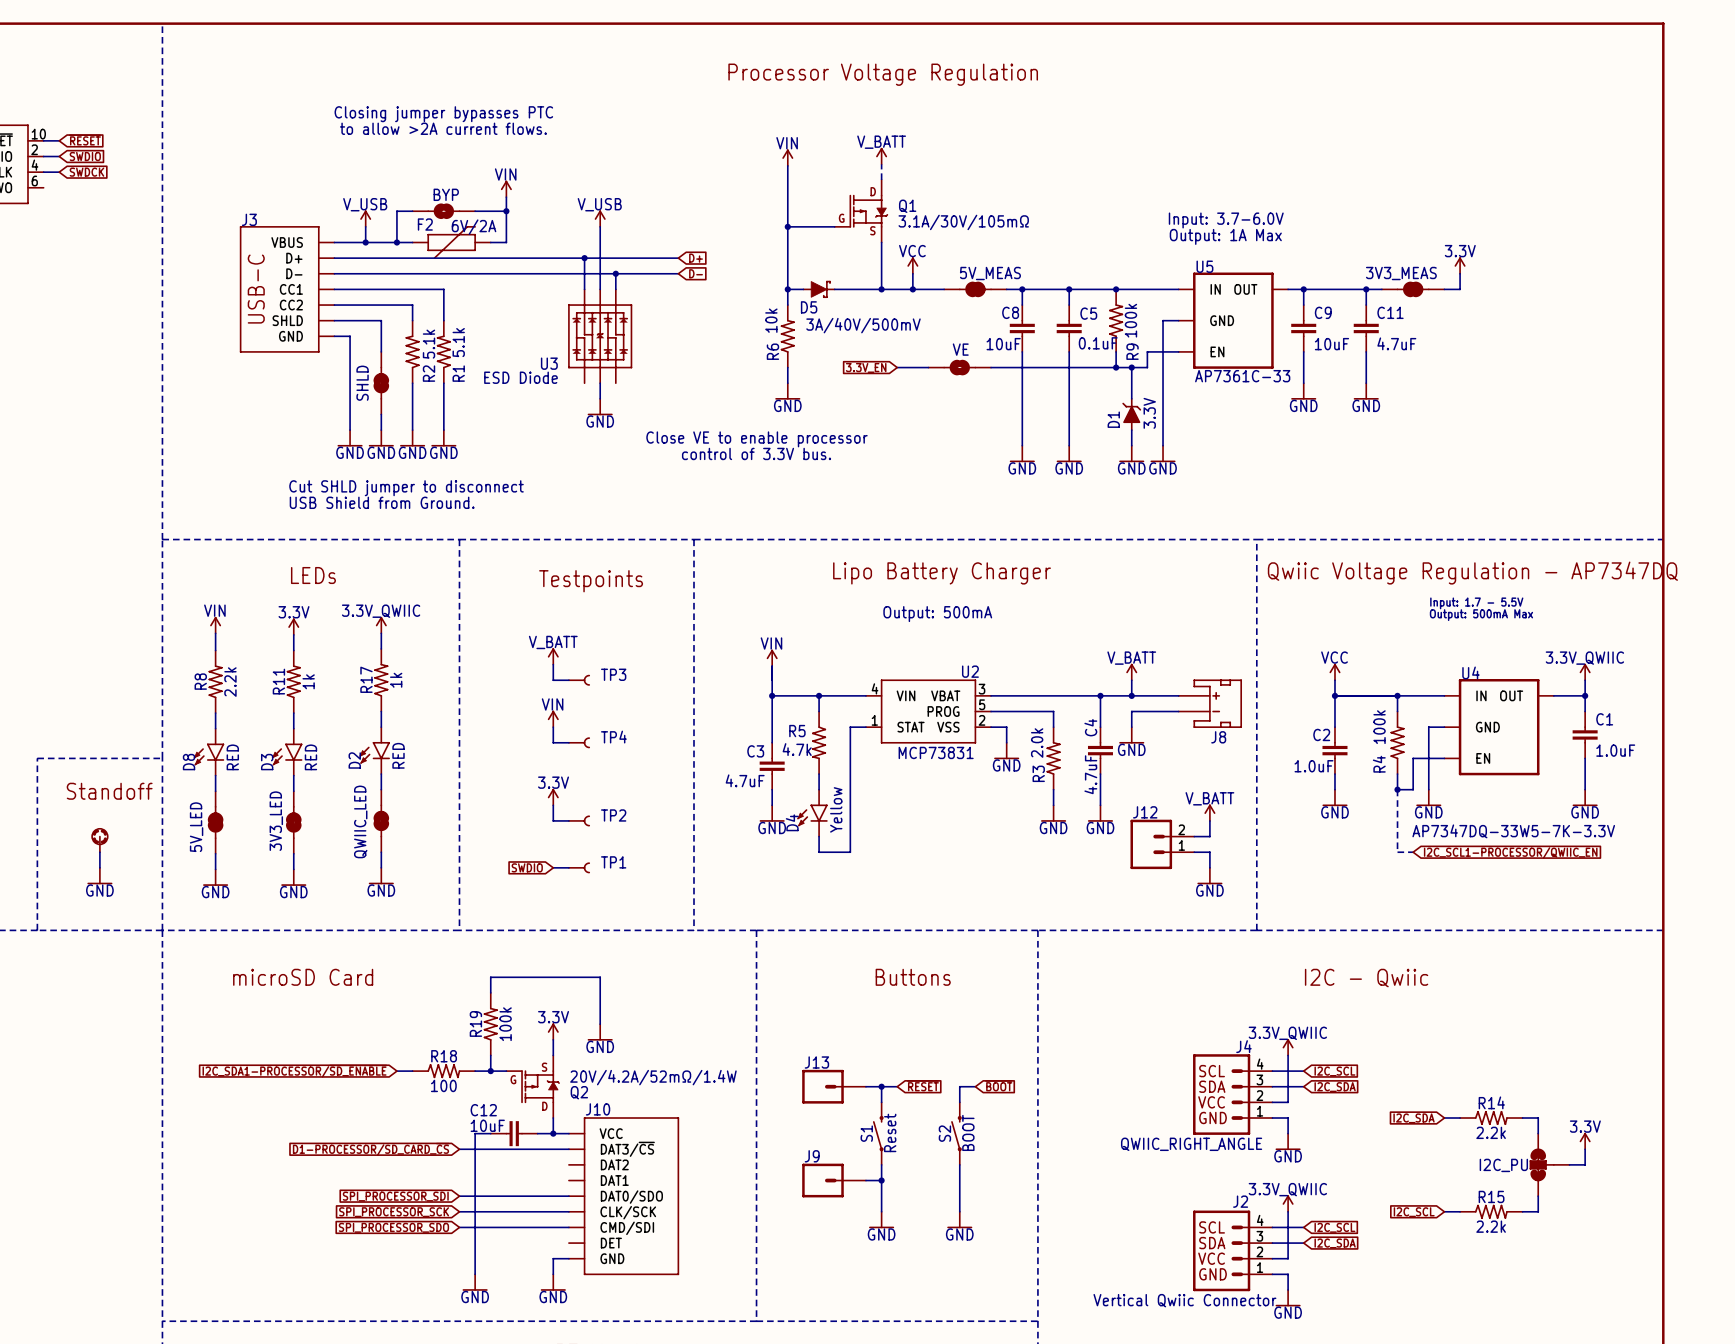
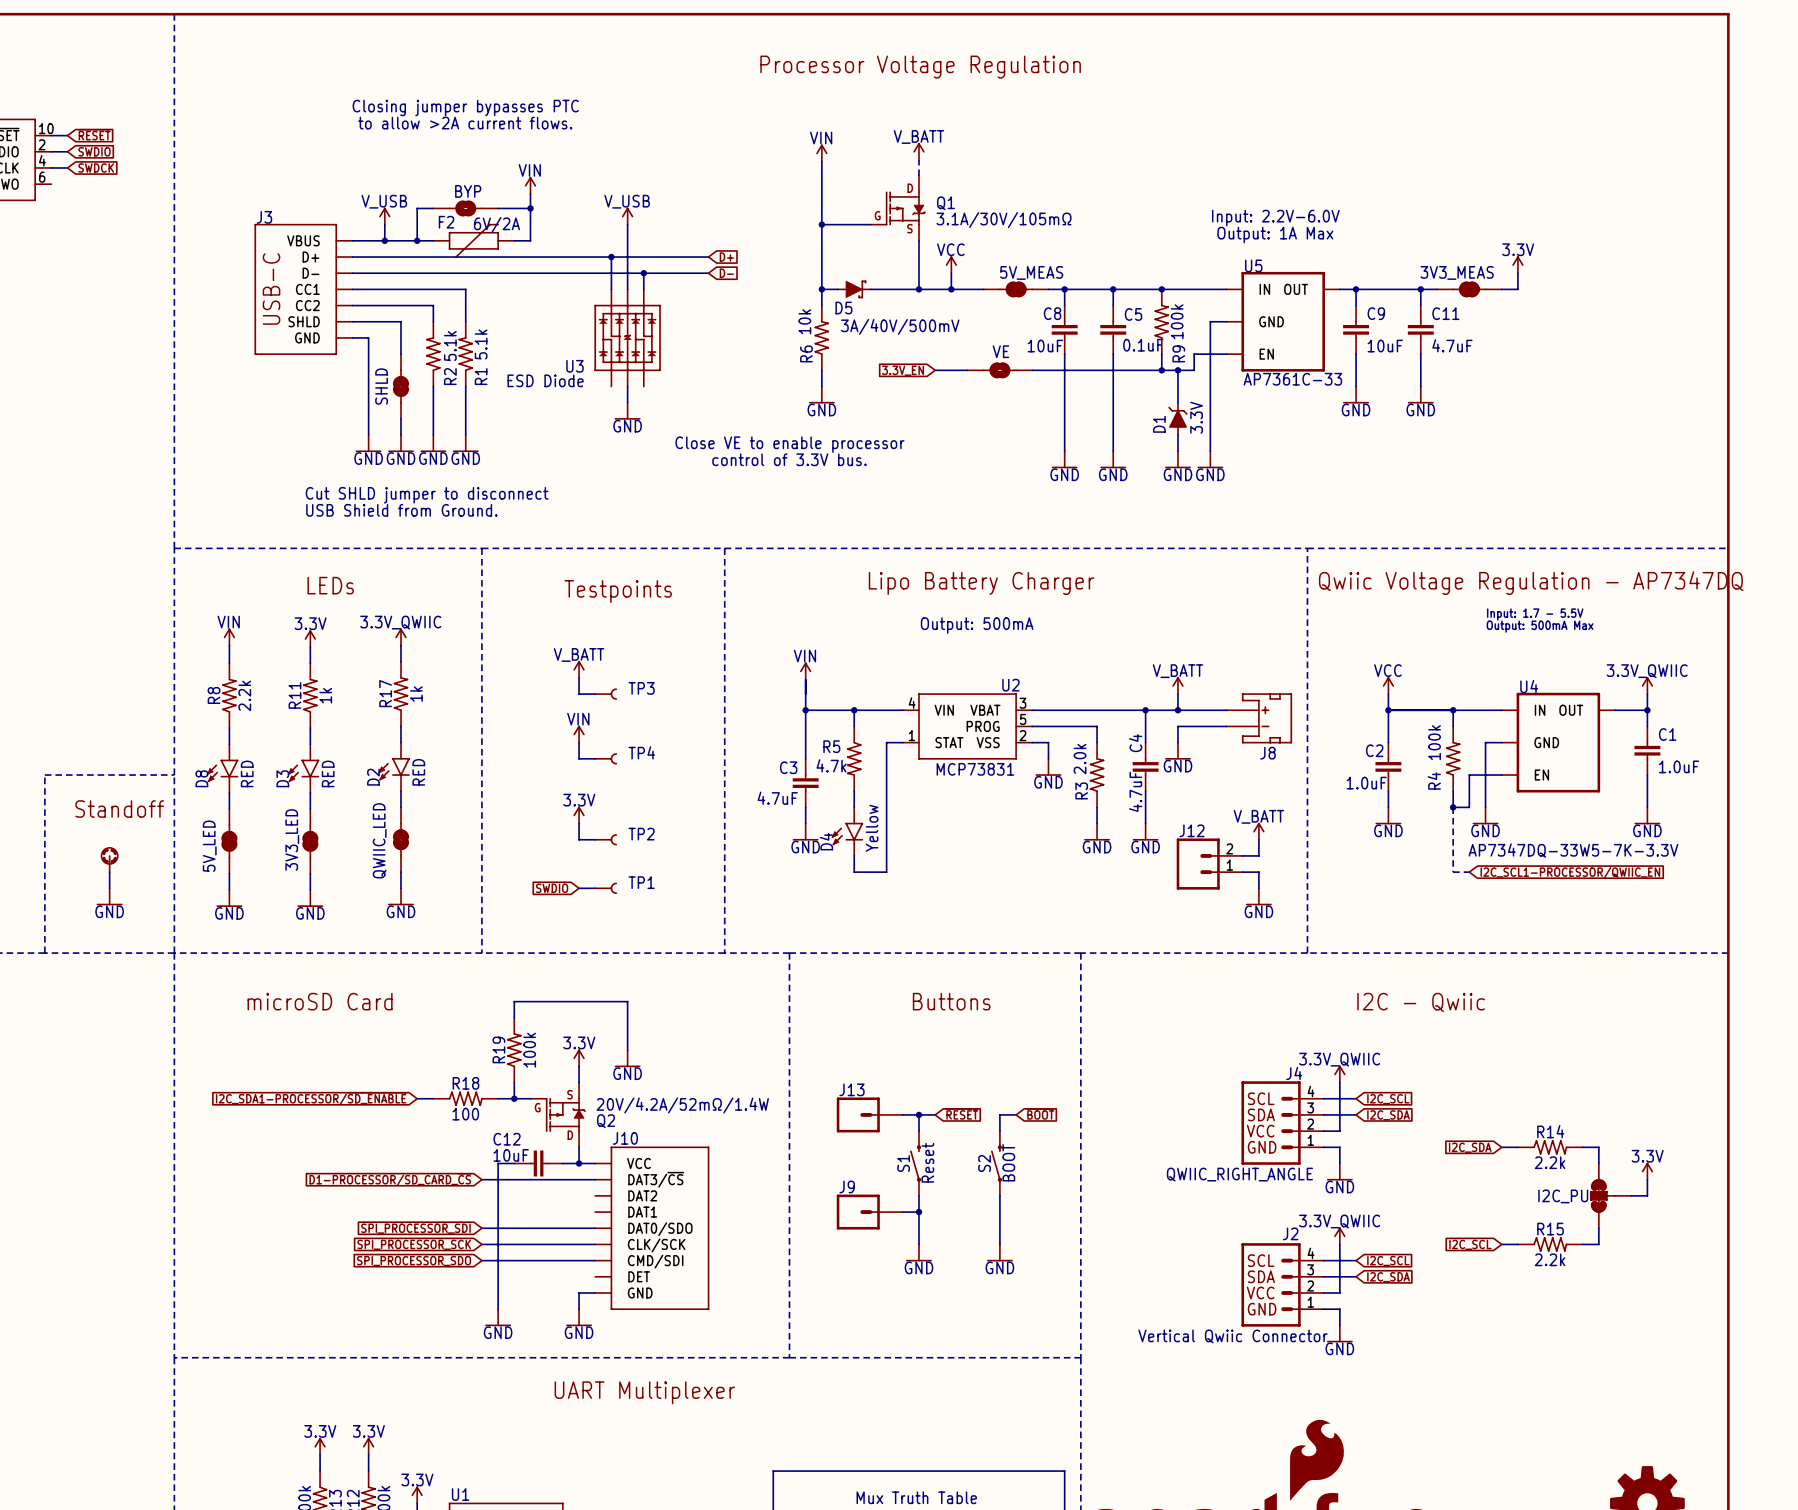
text: Input: 3.7-6.0V (1226, 220) -> Input: 2.2V-6.0V (1275, 218)

